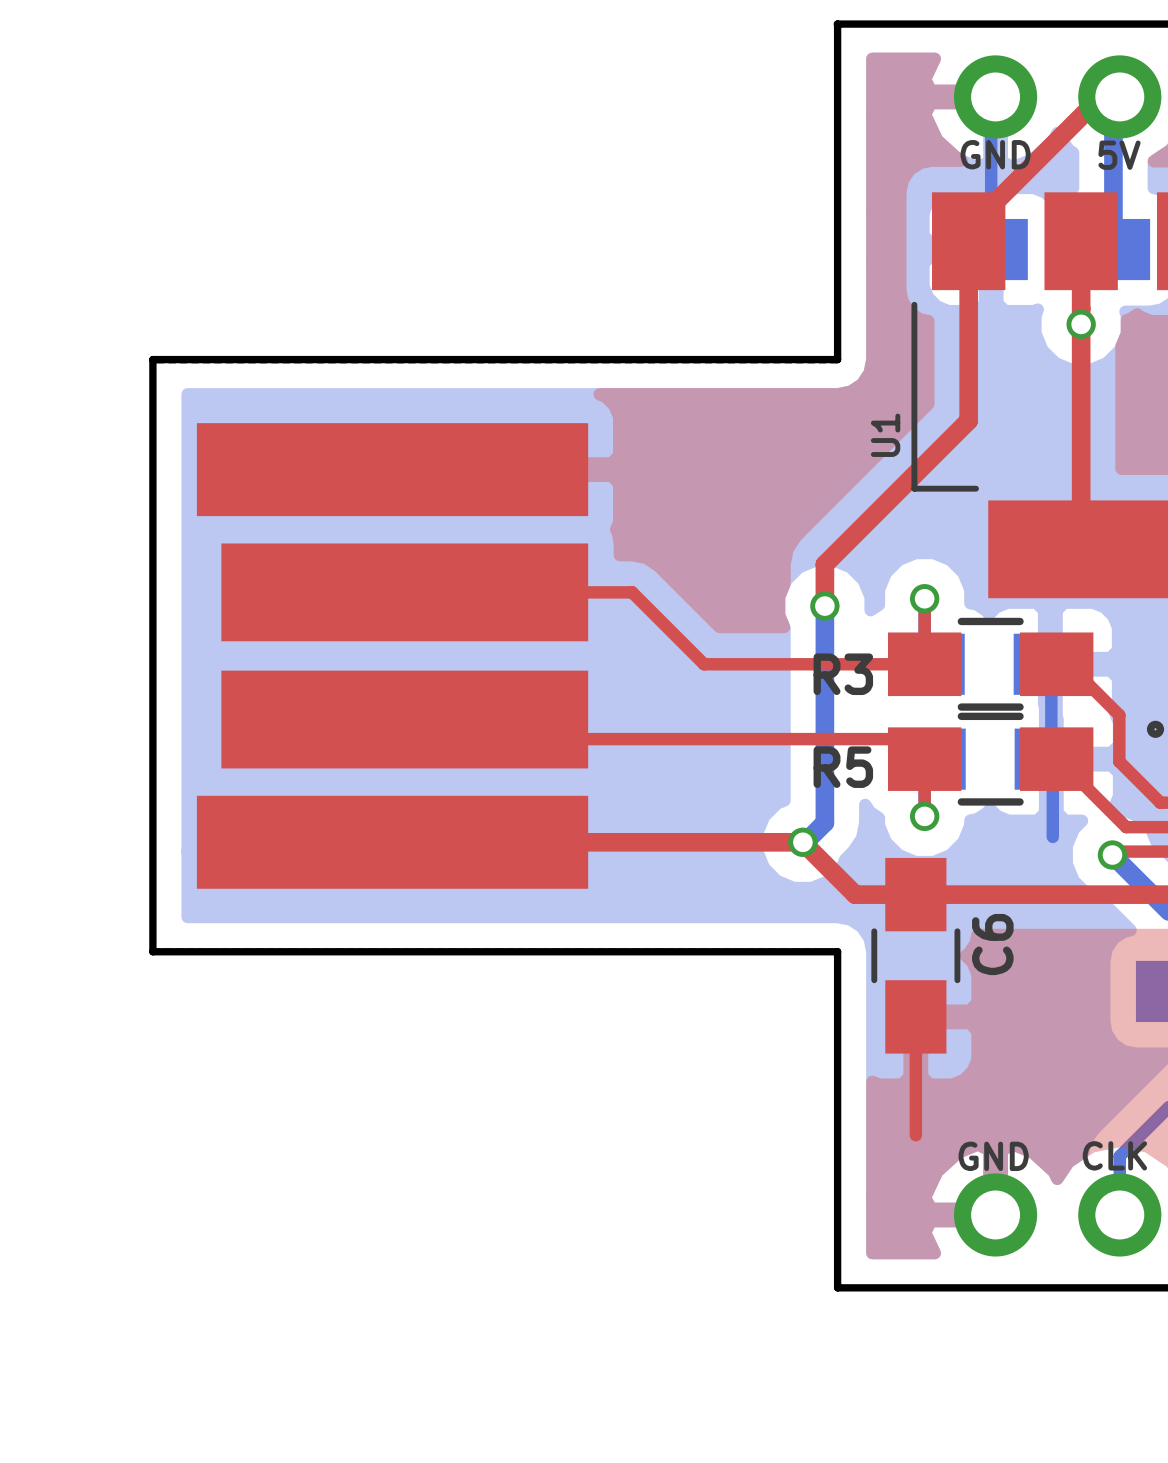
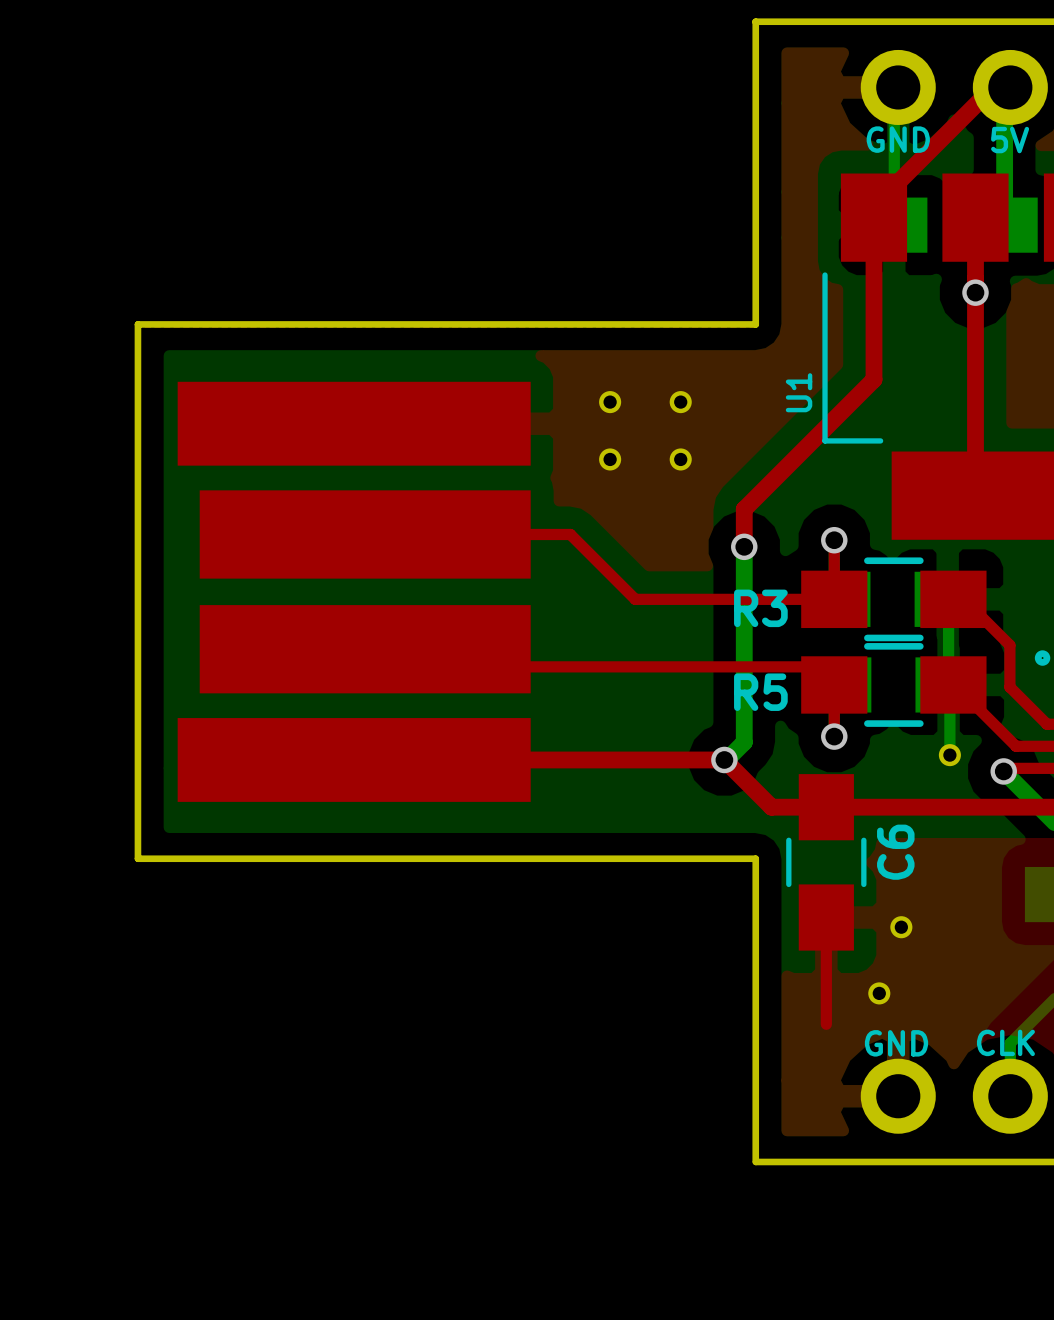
part: none -> (610, 402)
part: none -> (680, 402)
part: none -> (610, 459)
part: none -> (680, 459)
part: none -> (949, 755)
part: none -> (901, 927)
part: none -> (879, 993)

